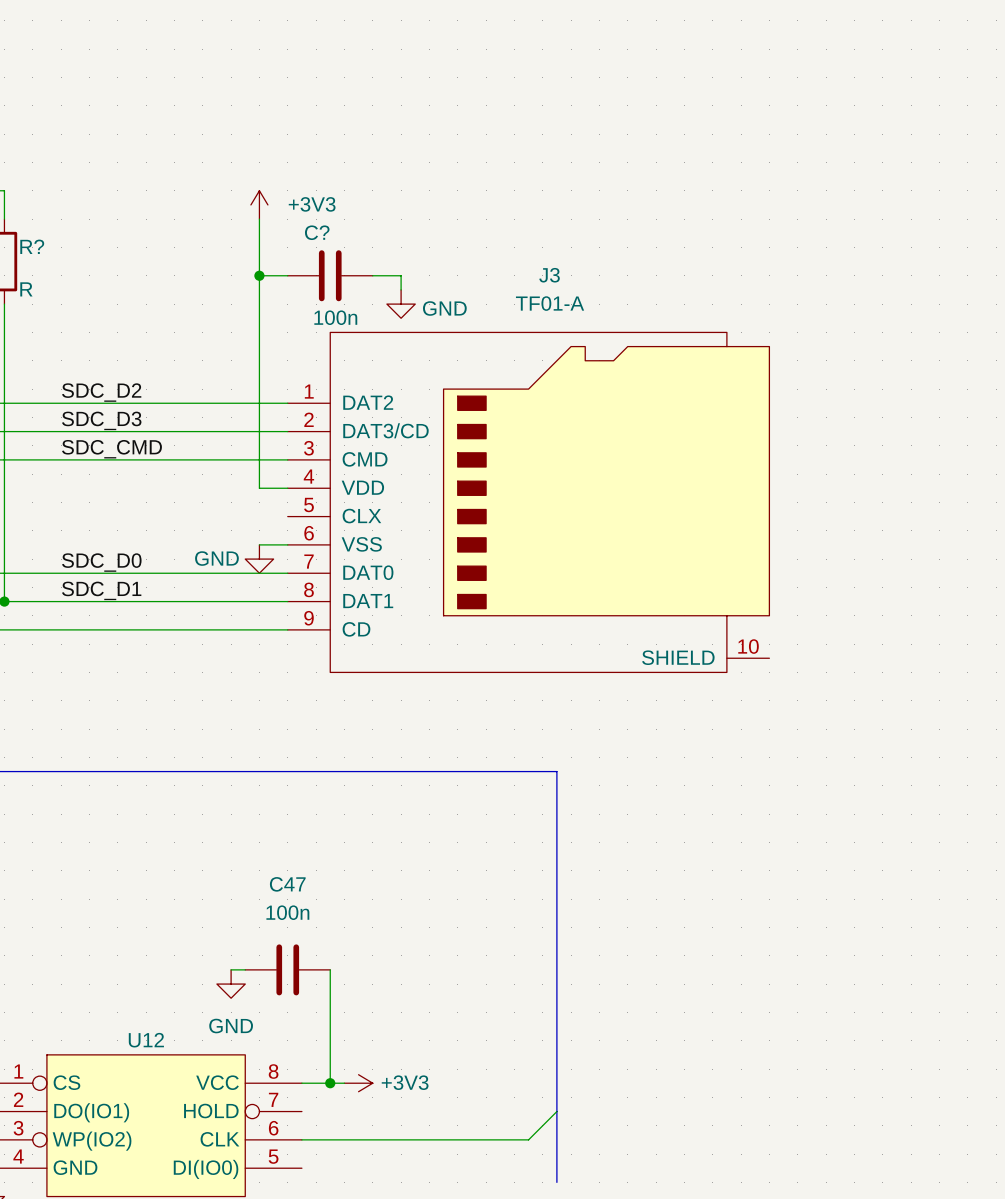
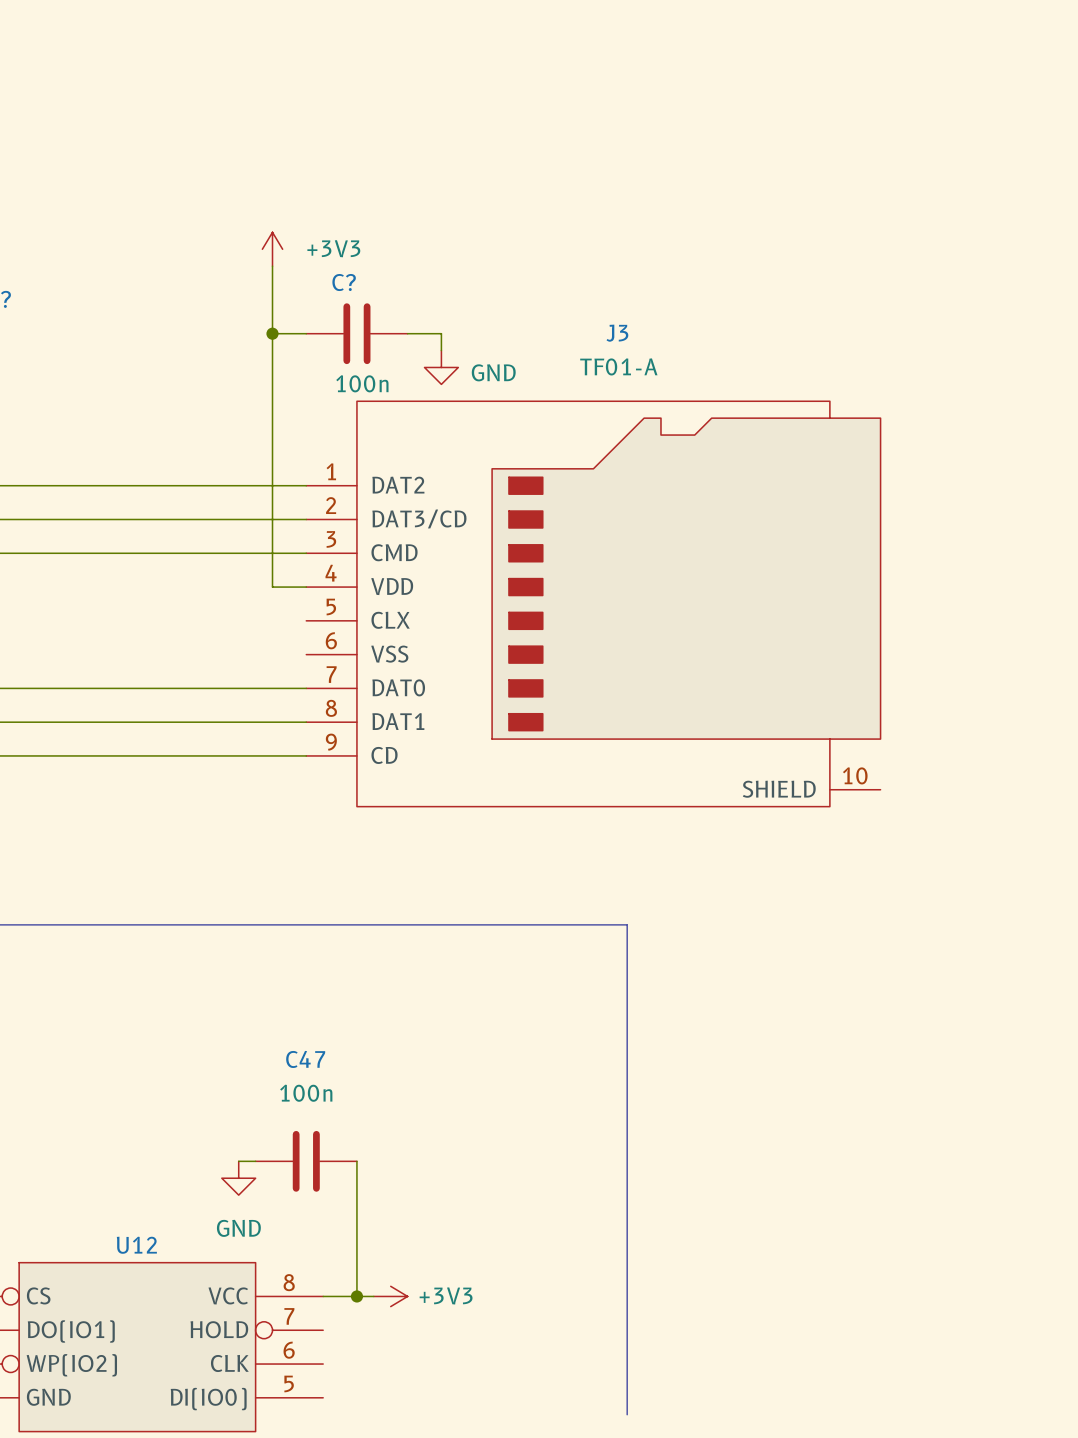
label: SDC_D2 (101, 392) -> none
label: SDC_D3 (101, 420) -> none
label: SDC_CMD (111, 449) -> none
wire: (259, 544) (287, 544) -> none
power symbol: GND (259, 559) -> none
label: SDC_D0 (101, 562) -> none
label: SDC_D1 (101, 590) -> none
wire: (556, 1111) (528, 1139) (301, 1139) -> none

